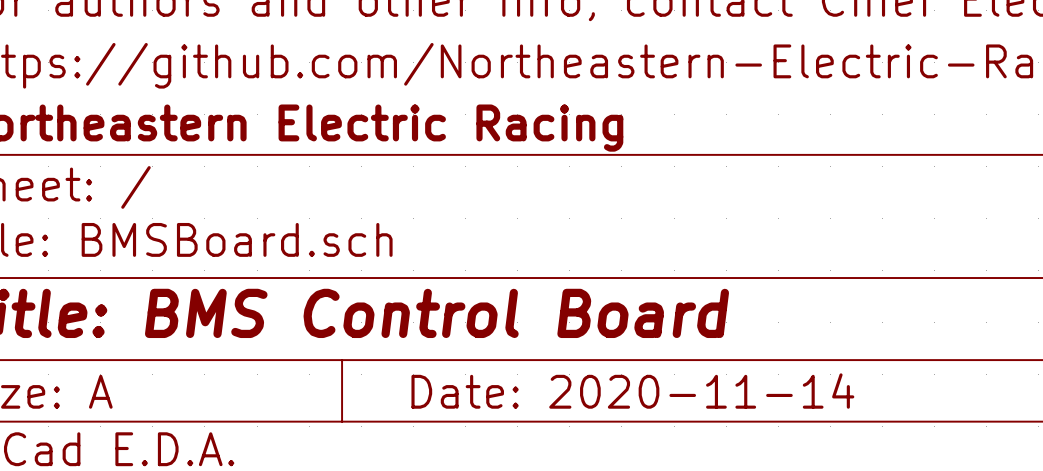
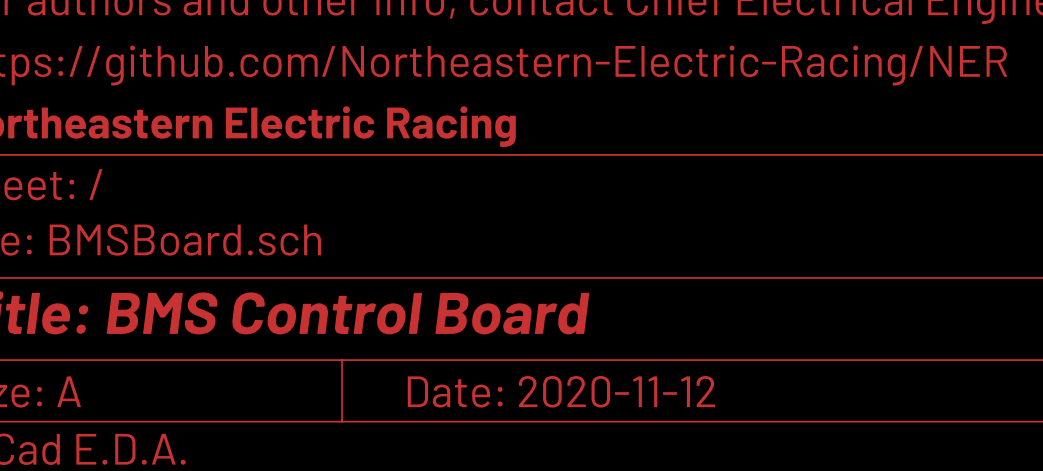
title block: Date: 2020-11-14 (632, 391) -> Date: 2020-11-12 (561, 391)

